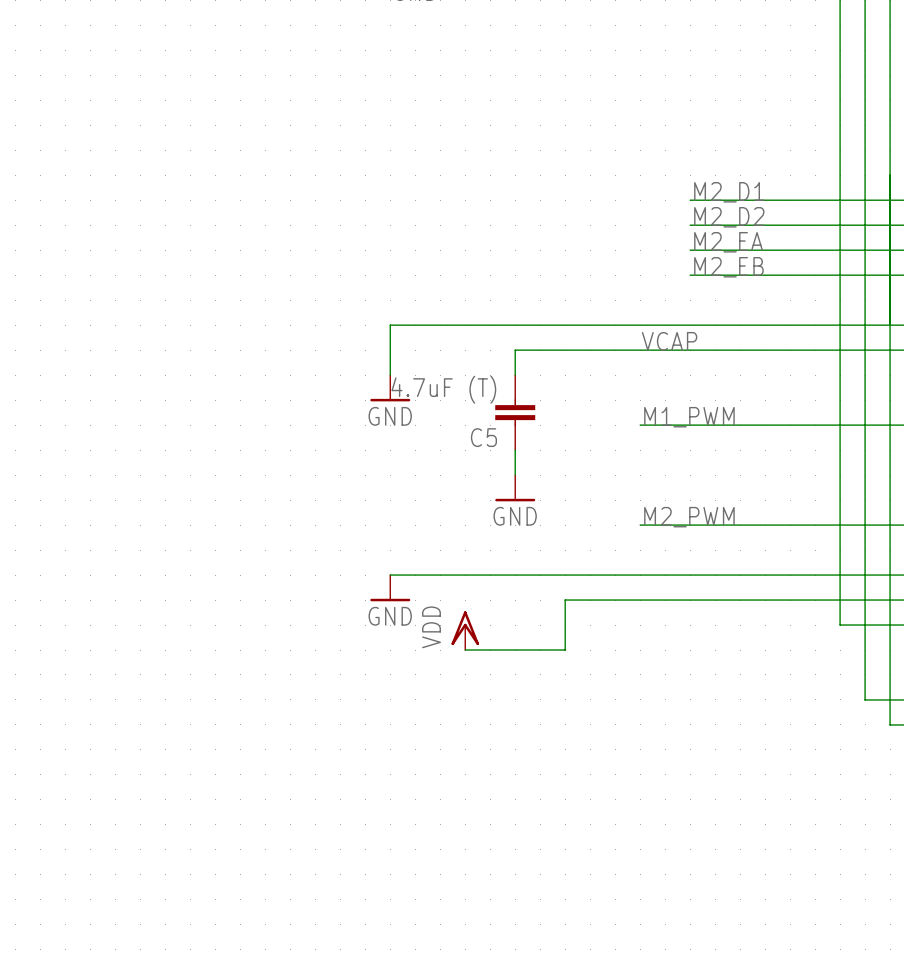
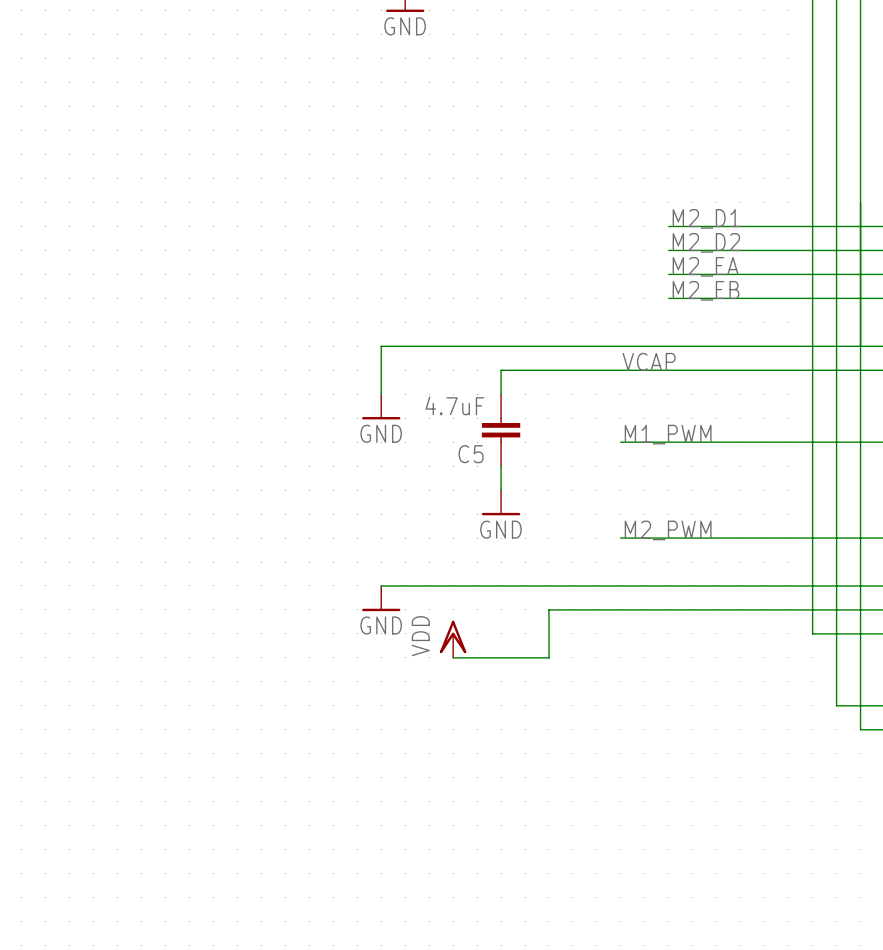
C5 value: 4.7uF (T) (443, 389) -> 4.7uF (454, 405)

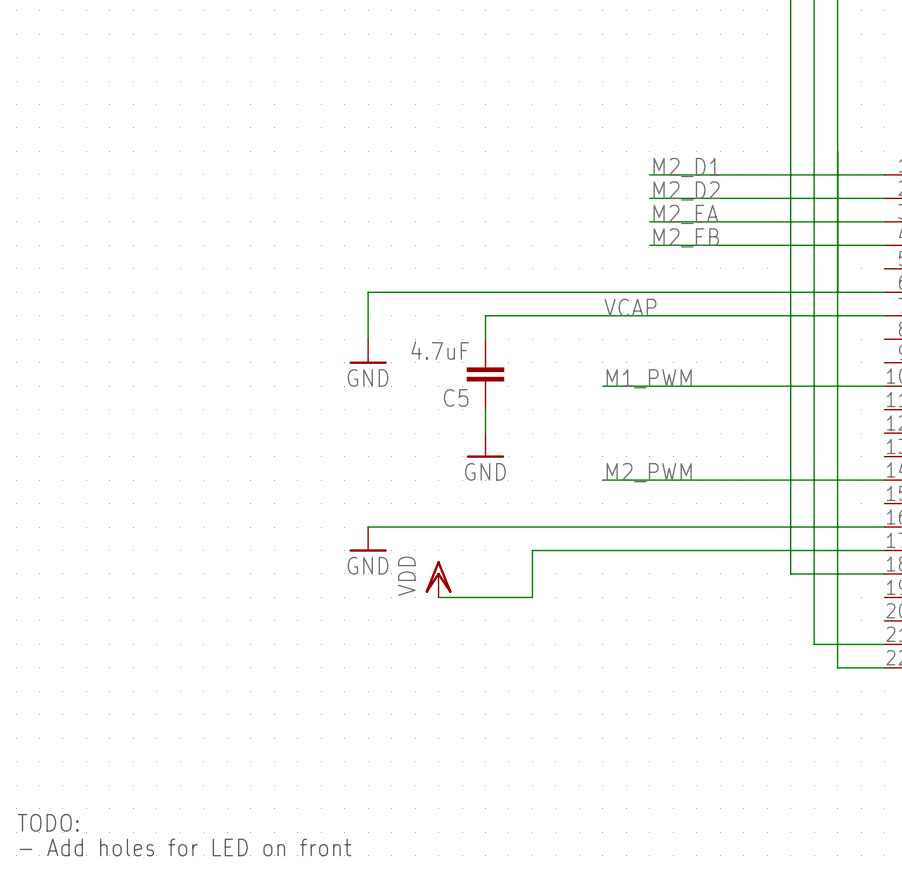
text: none -> TODO: (48, 822)
text: none -> - Add holes for LED on front (185, 847)

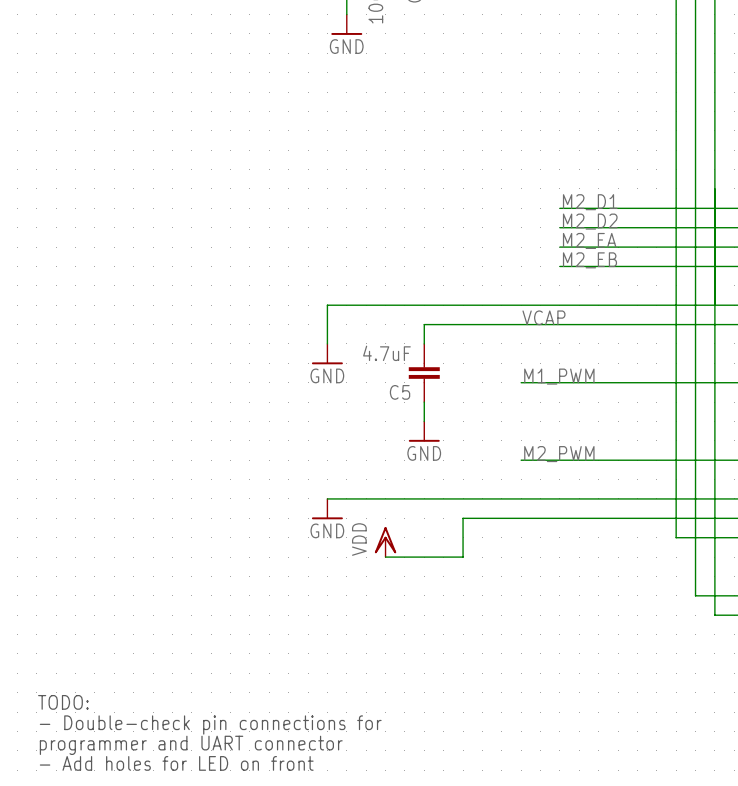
text: none -> TODO: (63, 702)
text: none -> - Double-check pin connections for (210, 724)
text: TODO: (48, 822) -> programmer and UART connector (191, 745)

